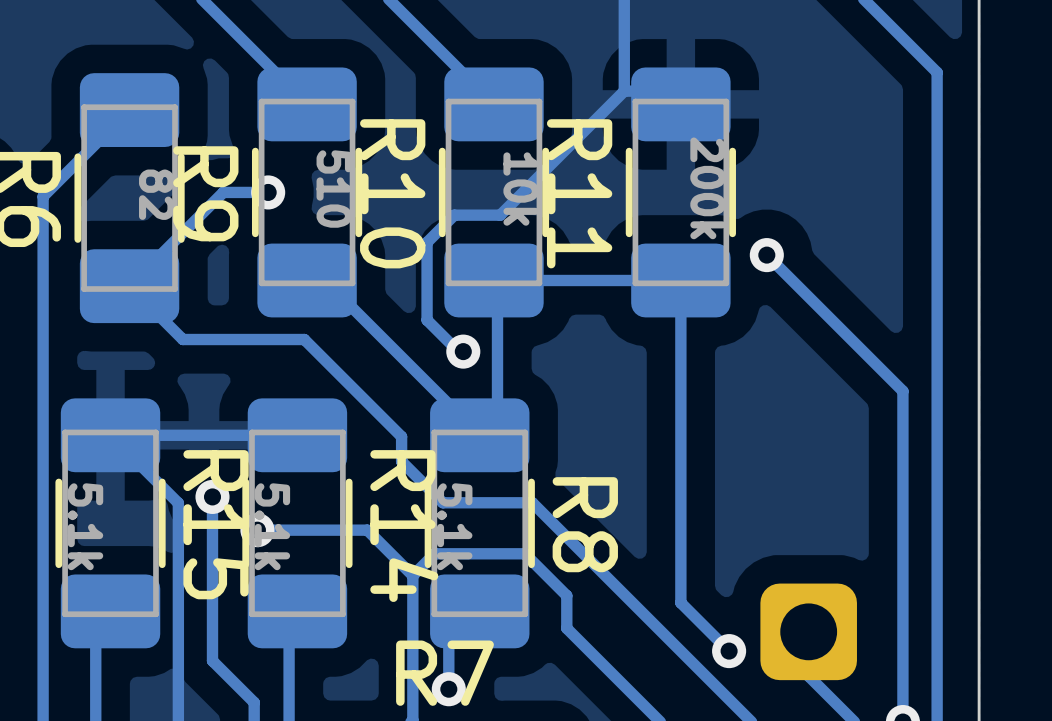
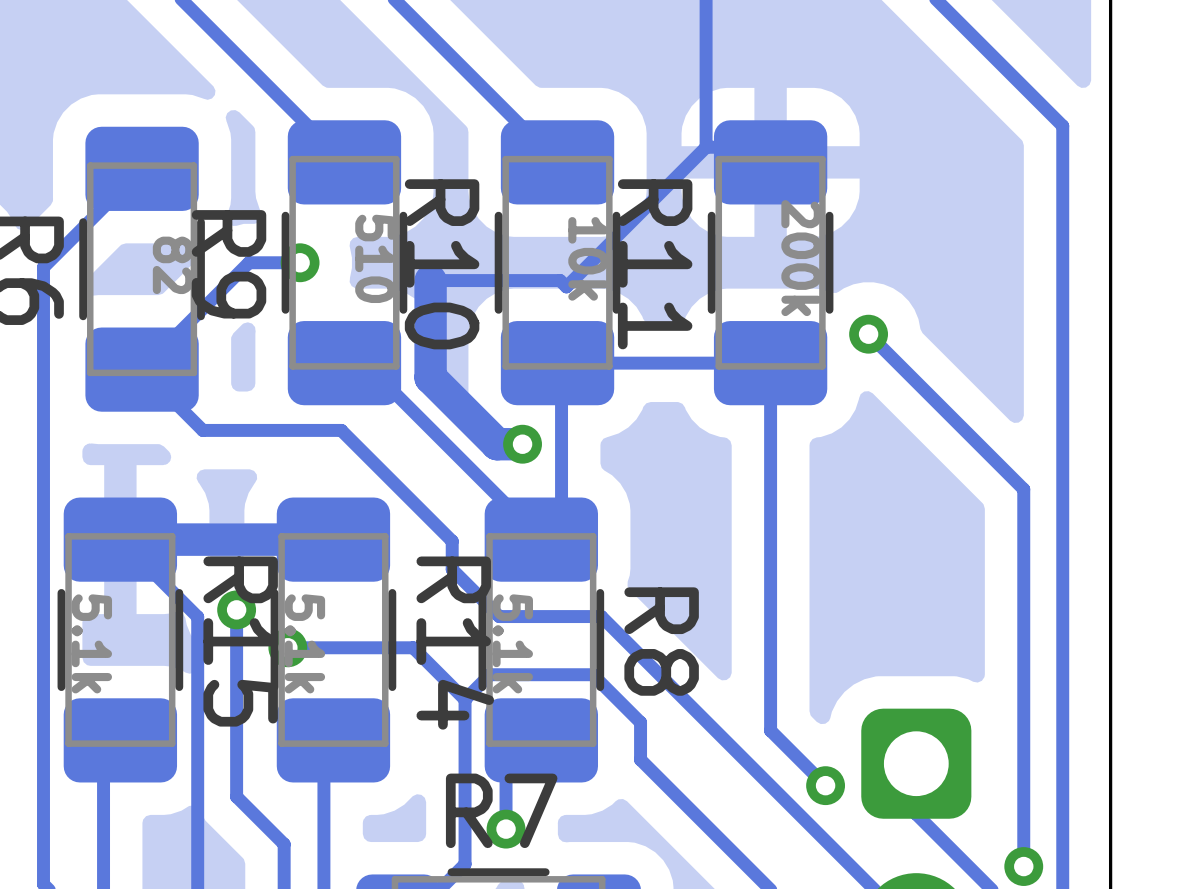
track: (624, 91) (500, 215) (454, 215) (427, 242) (427, 320) (458, 351) -> (706, 147) (566, 286) (560, 280) (430, 280) (430, 377) (497, 444) (517, 444)
track width: thin (297, 435) (110, 435) -> thick (333, 539) (120, 539)

